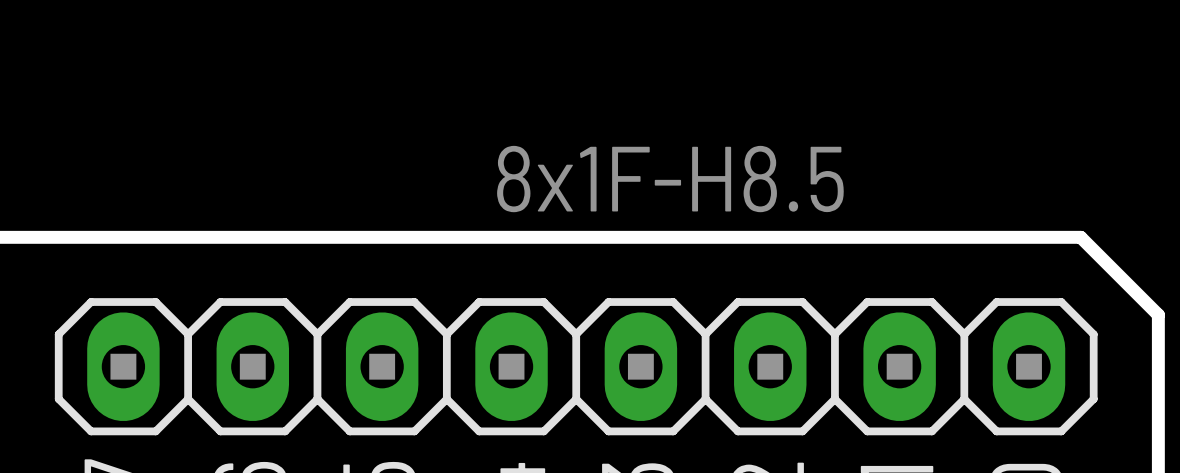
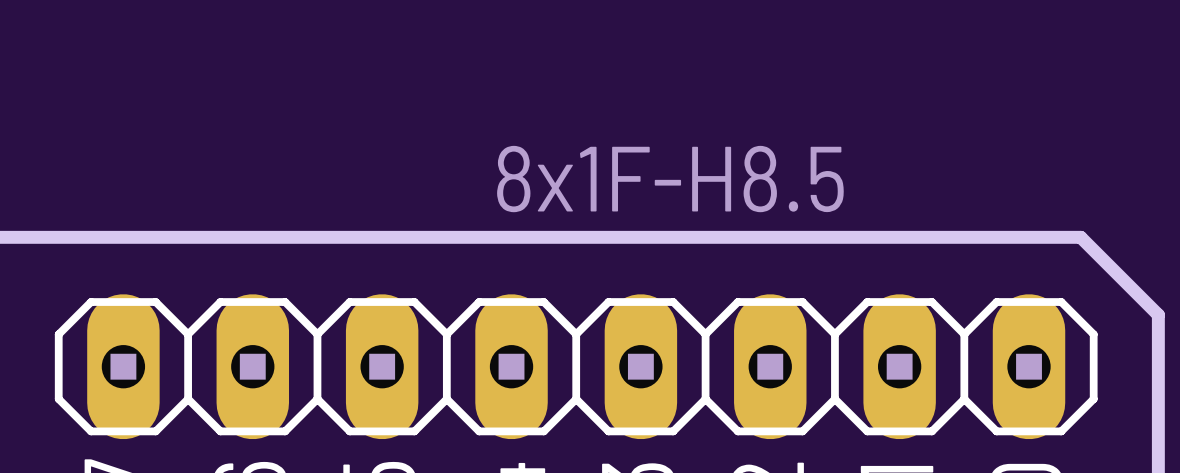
part footprint: [54, 298, 1098, 436] -> [54, 294, 1098, 440]

